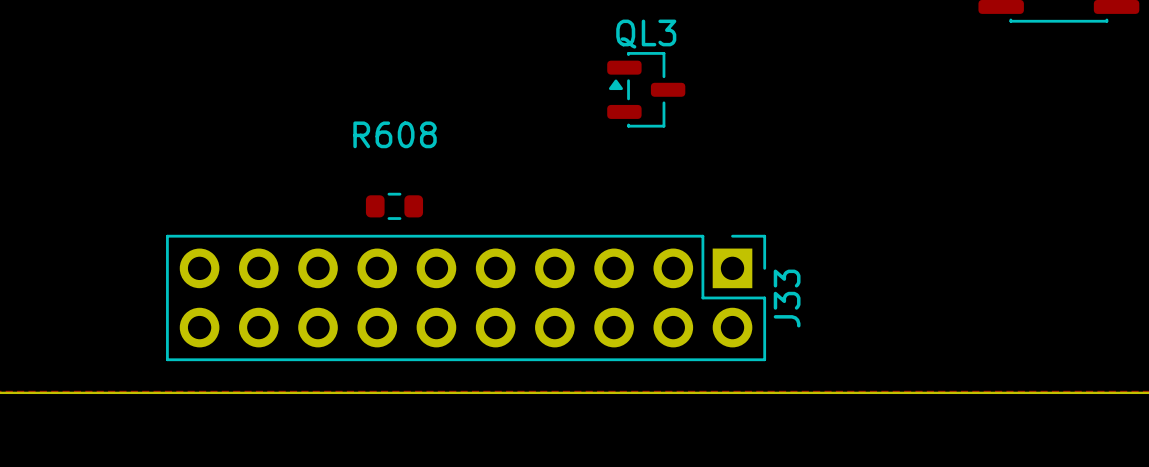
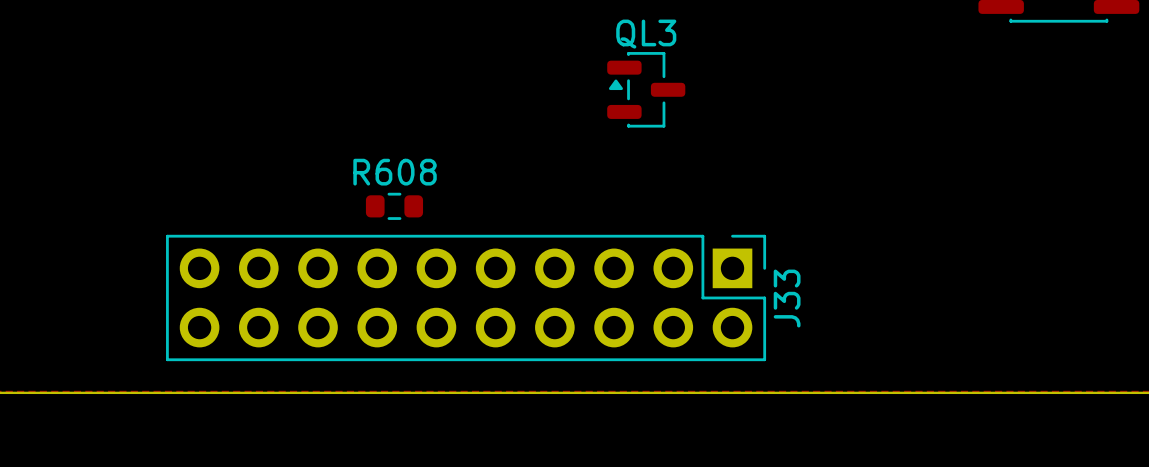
R608 name position: R608 (395, 134) -> R608 (395, 172)

